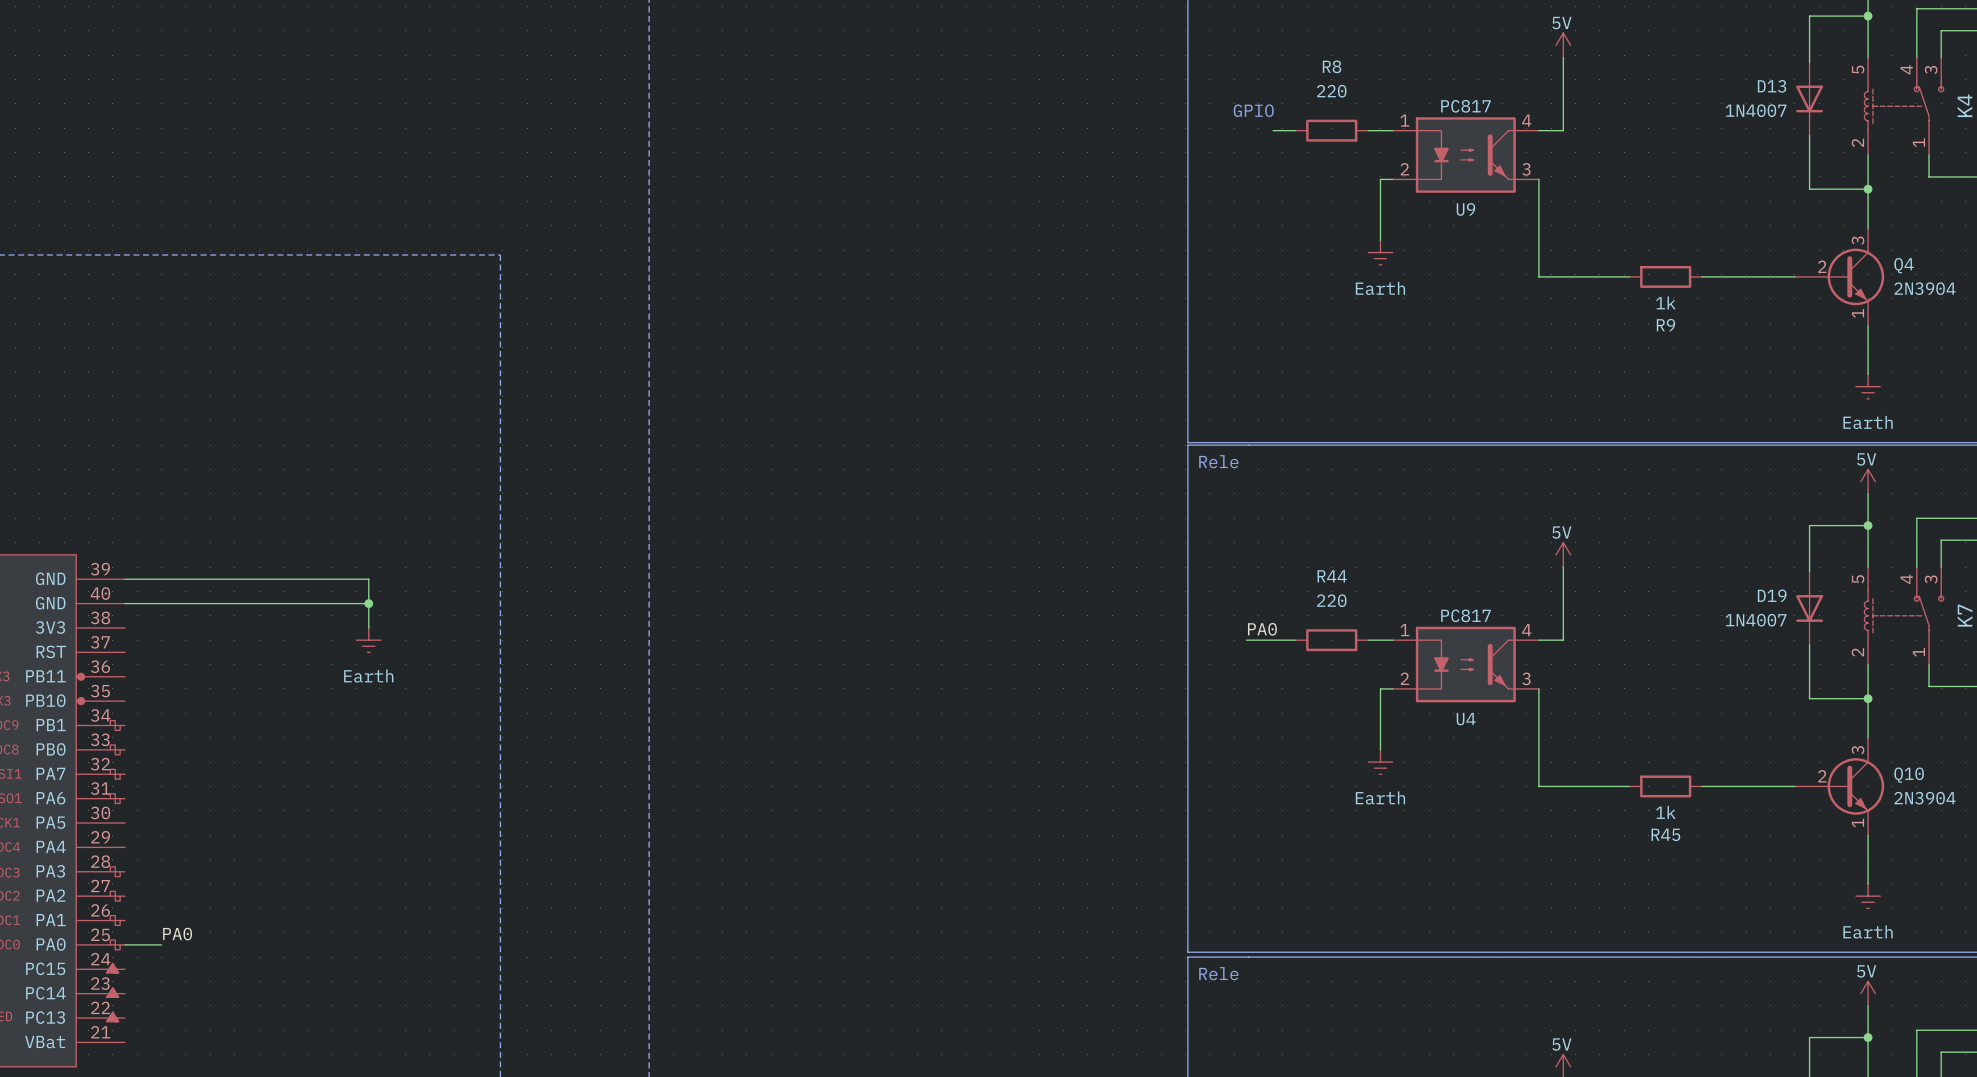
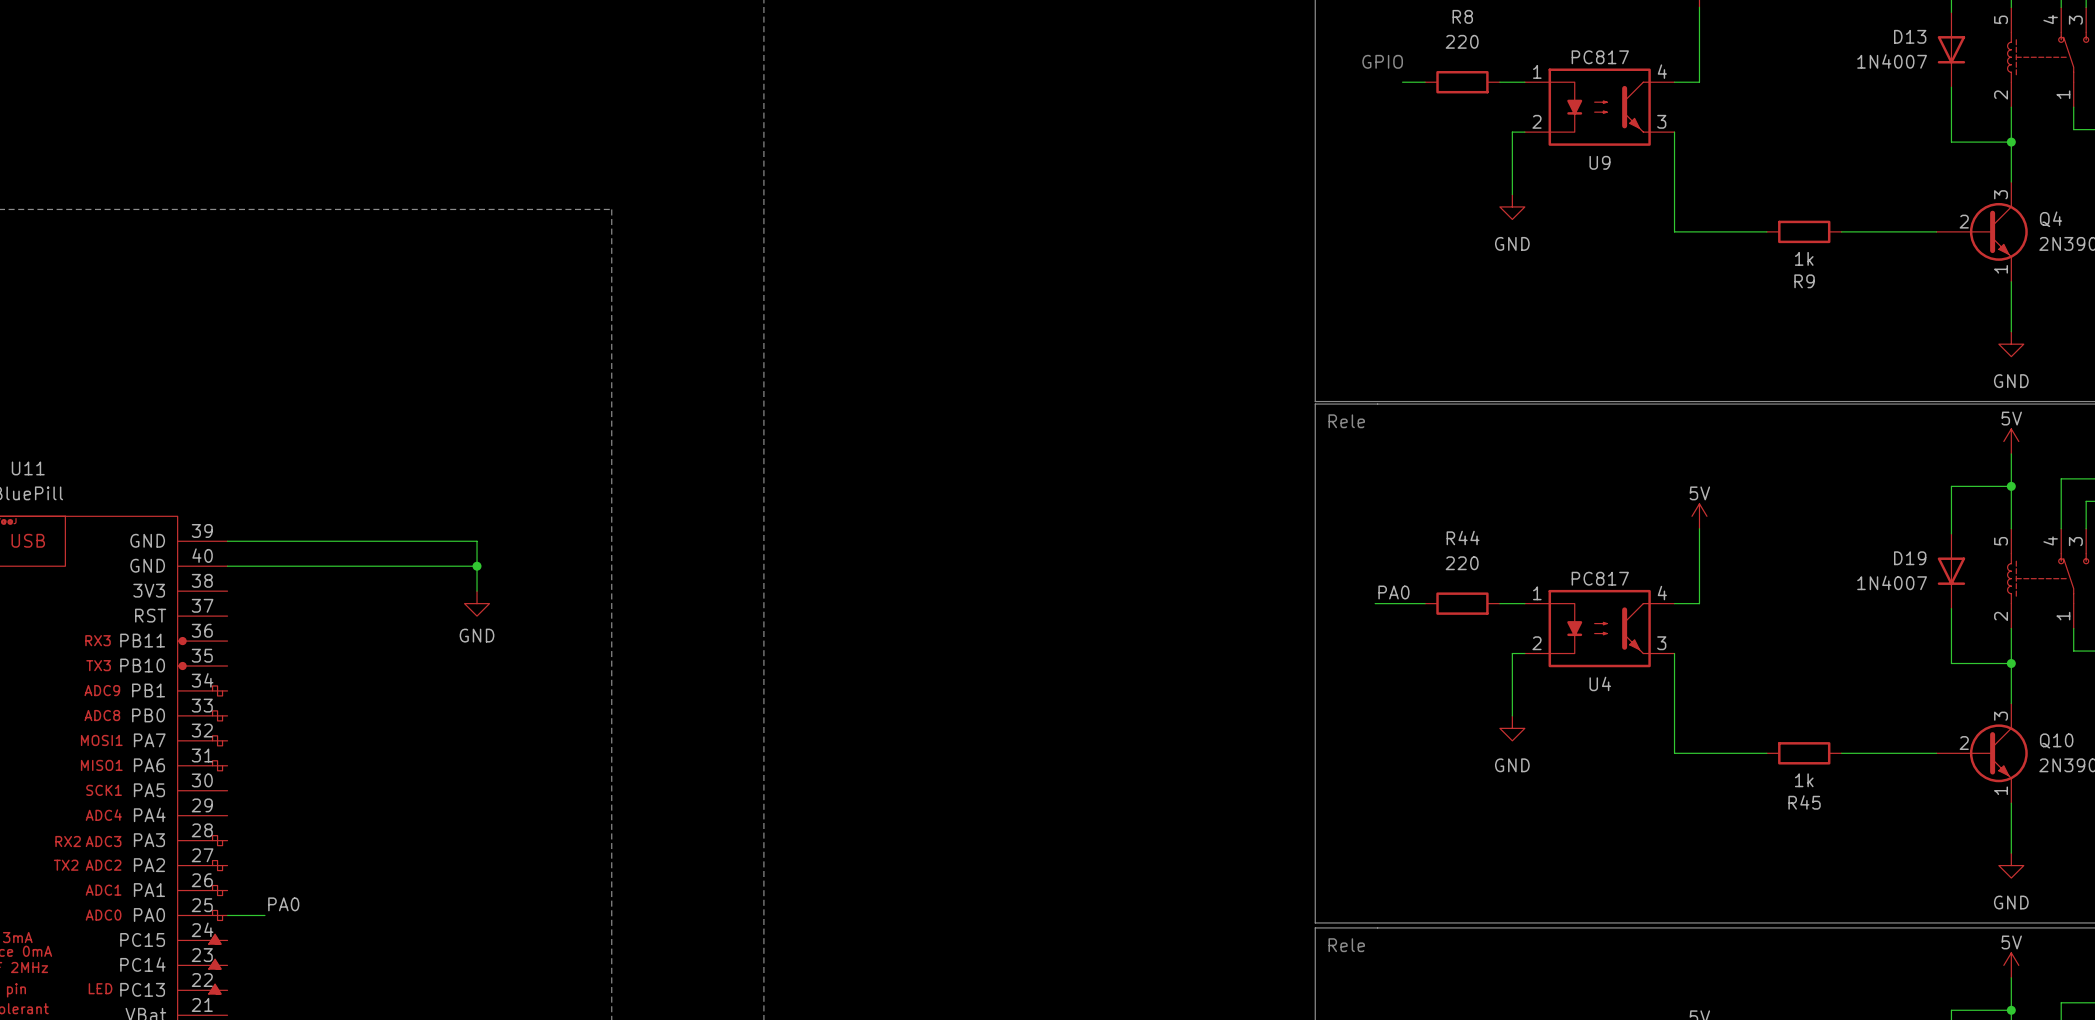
power symbol: Earth (1380, 252) -> GND (1512, 206)
power symbol: Earth (1868, 386) -> GND (2011, 344)
power symbol: Earth (368, 640) -> GND (477, 603)
power symbol: Earth (1380, 762) -> GND (1512, 728)
power symbol: Earth (1868, 896) -> GND (2011, 865)

